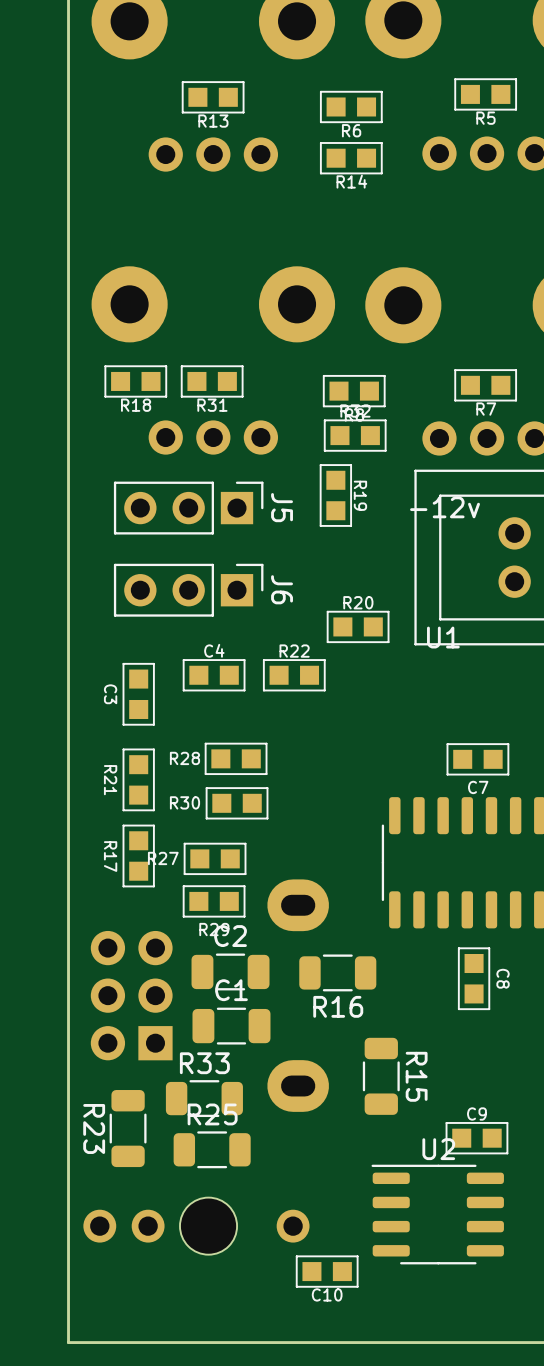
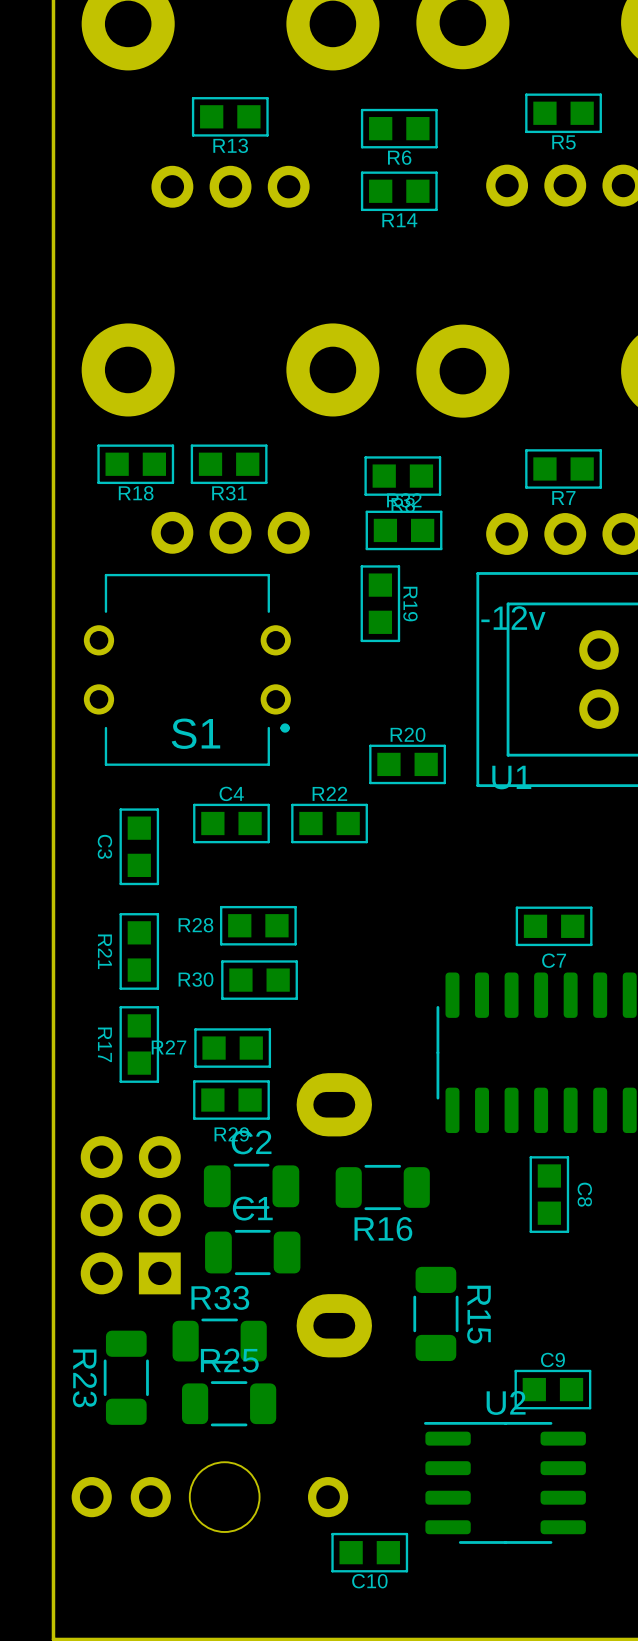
J5: (188, 508) -> none
S1: none -> (187, 669)
J6: (188, 590) -> none

